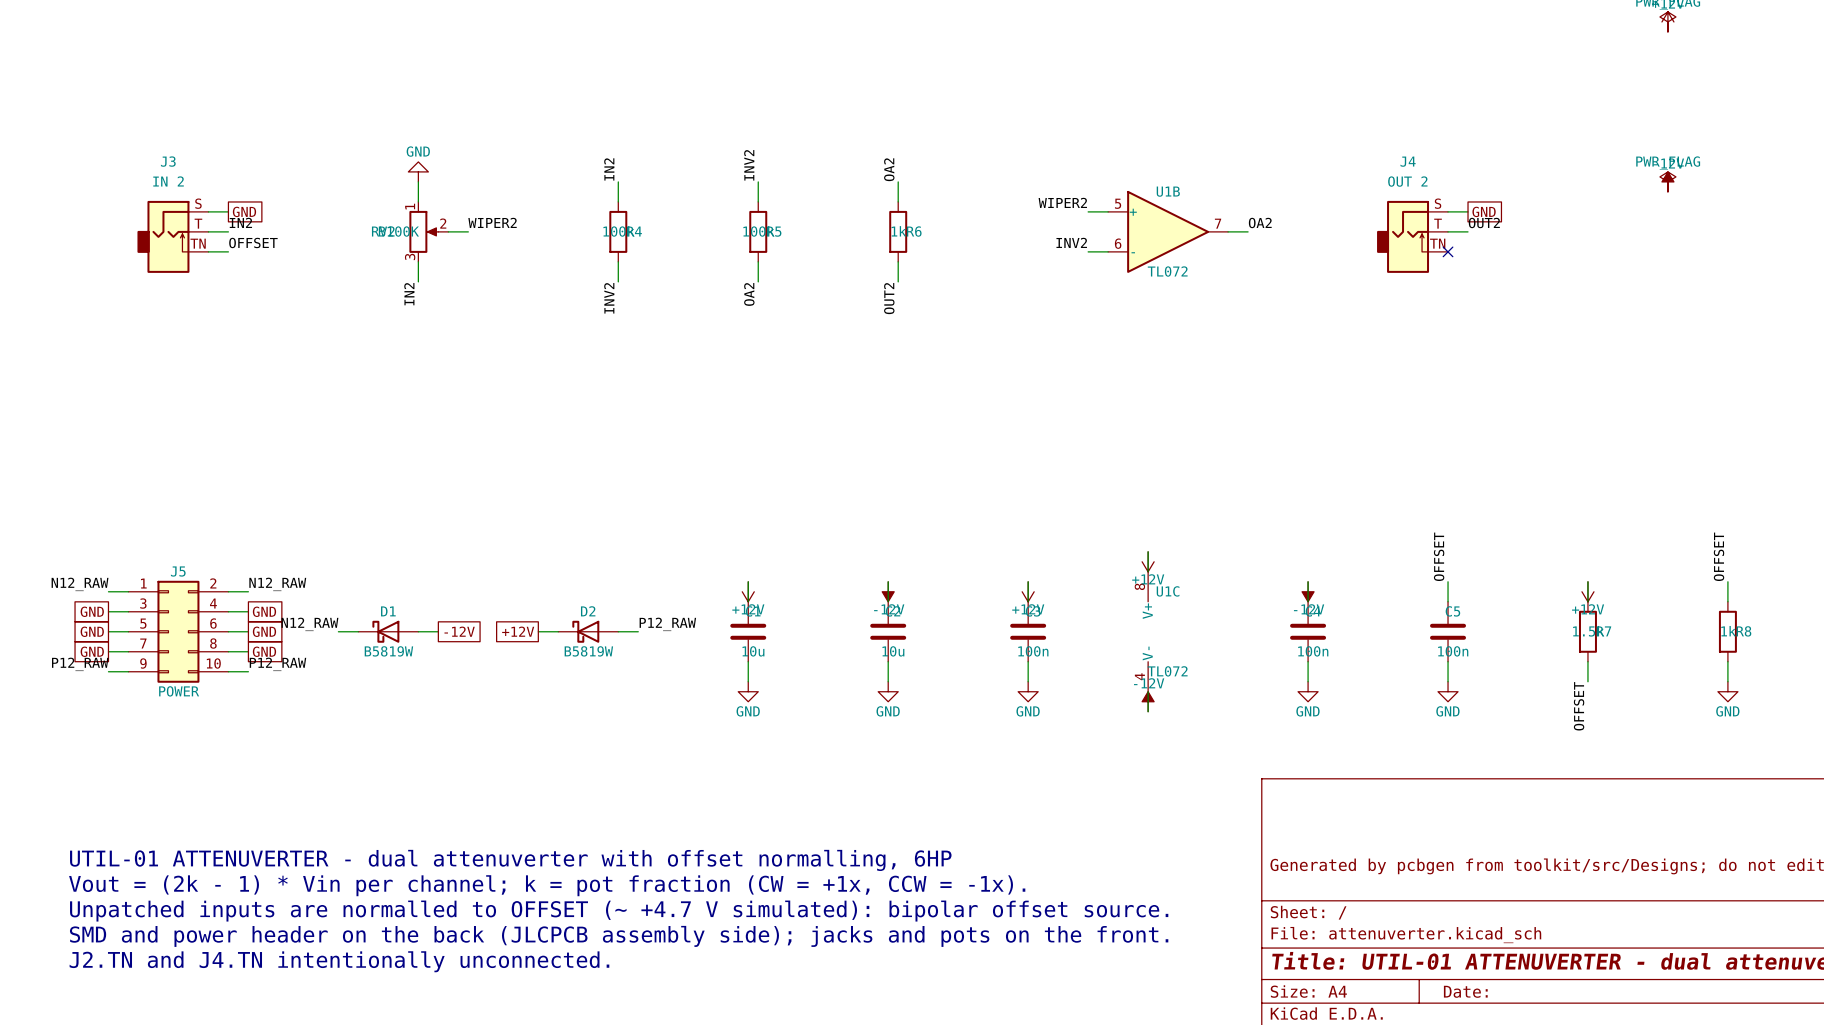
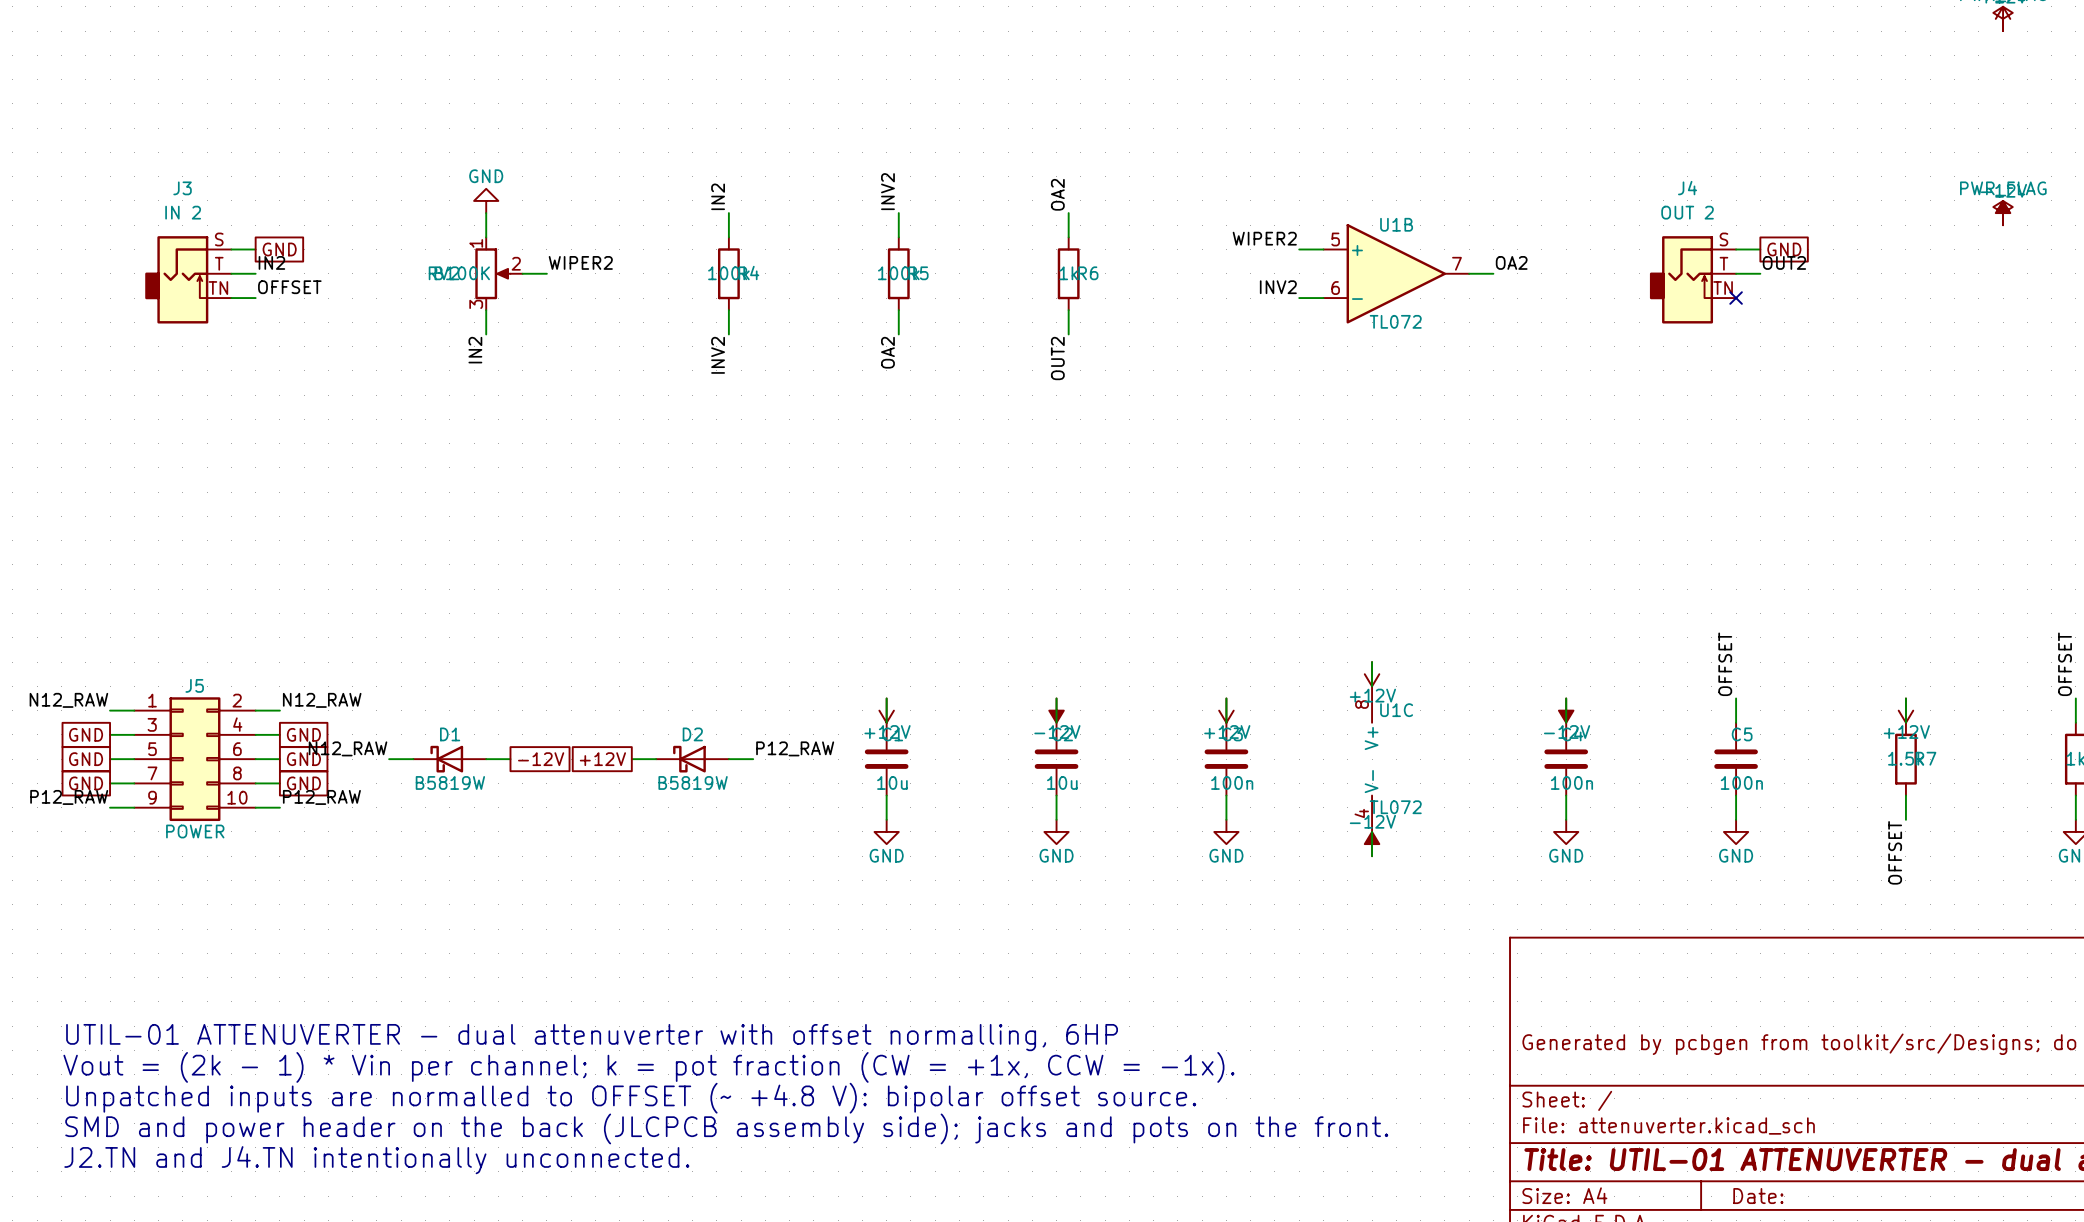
text: Unpatched inputs are normalled to OFFSET (~ +4.7 V simulated): bipolar offset source. (619, 911) -> Unpatched inputs are normalled to OFFSET (~ +4.8 V): bipolar offset source. (631, 1098)

